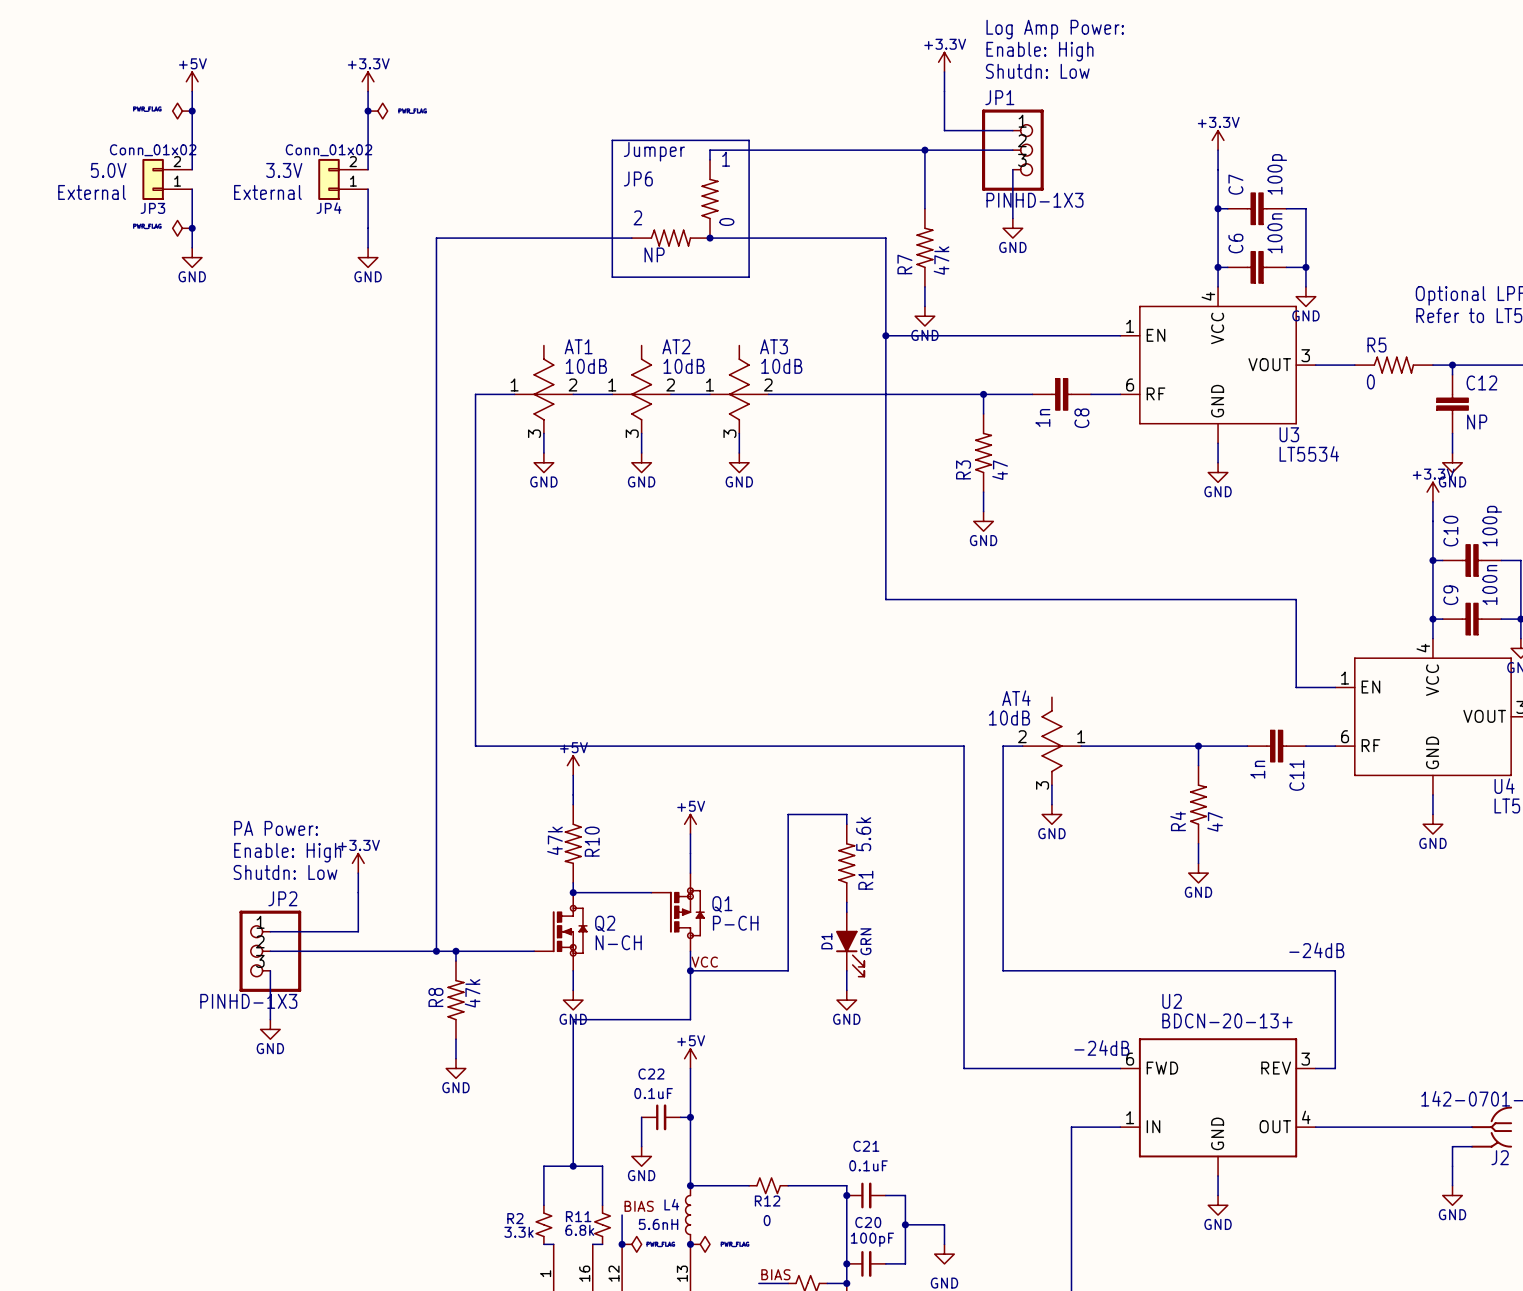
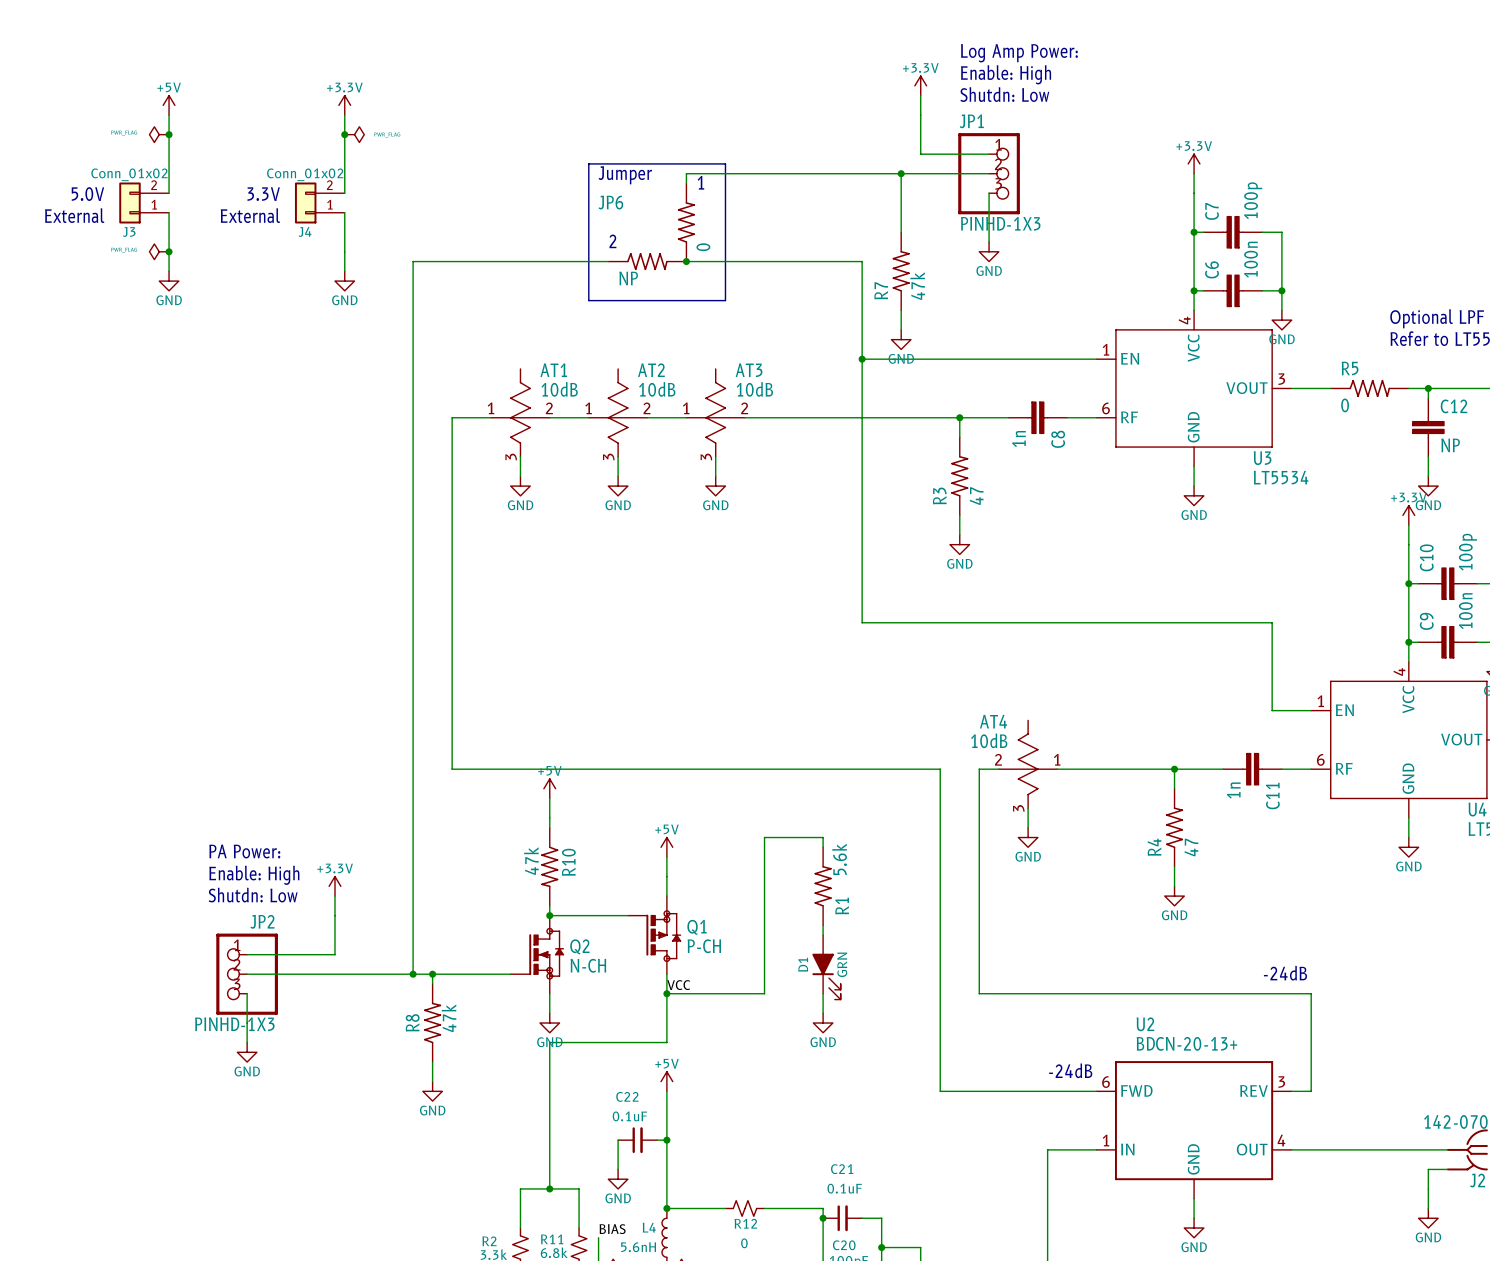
JP3 name: JP3 (152, 208) -> J3 (129, 231)
JP4 name: JP4 (328, 208) -> J4 (305, 231)

